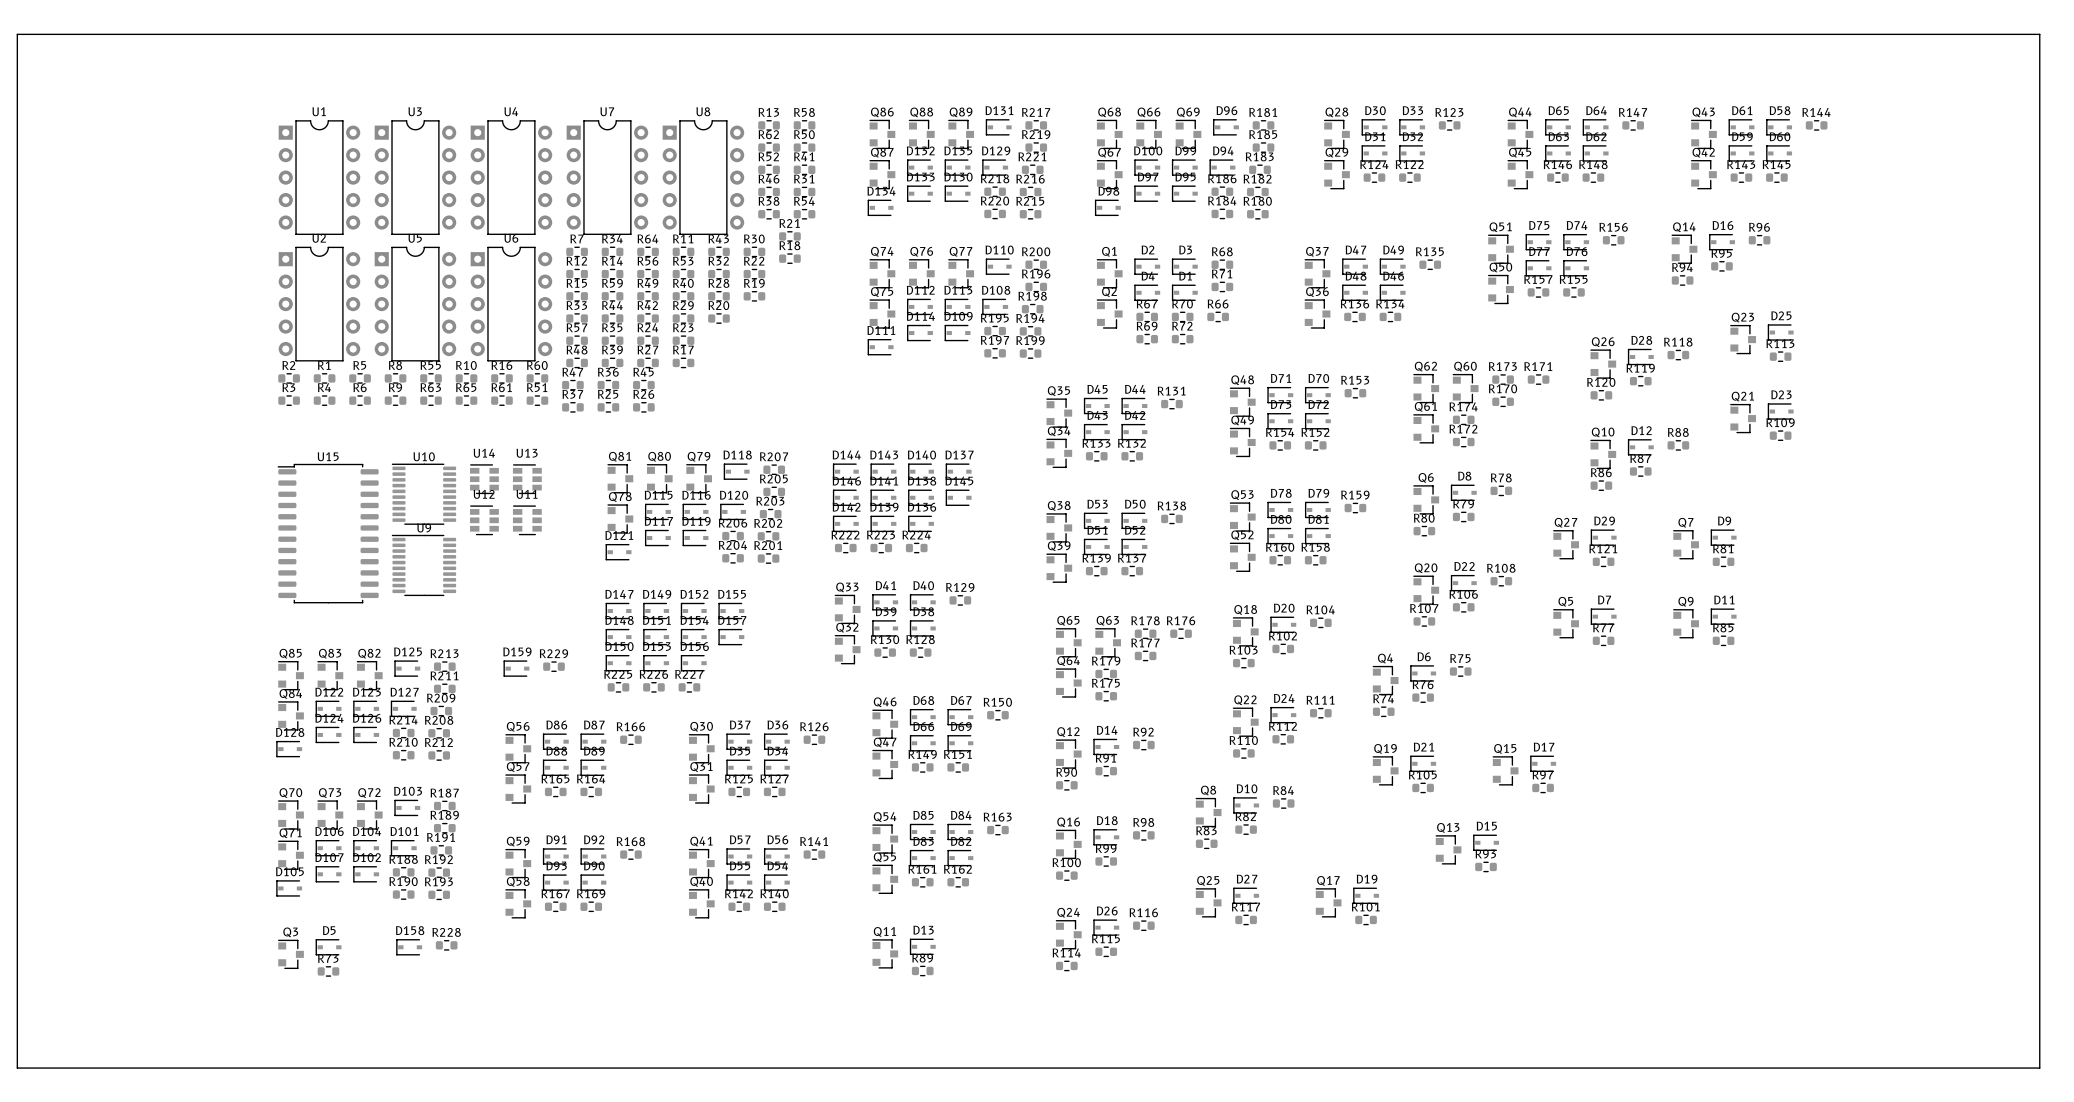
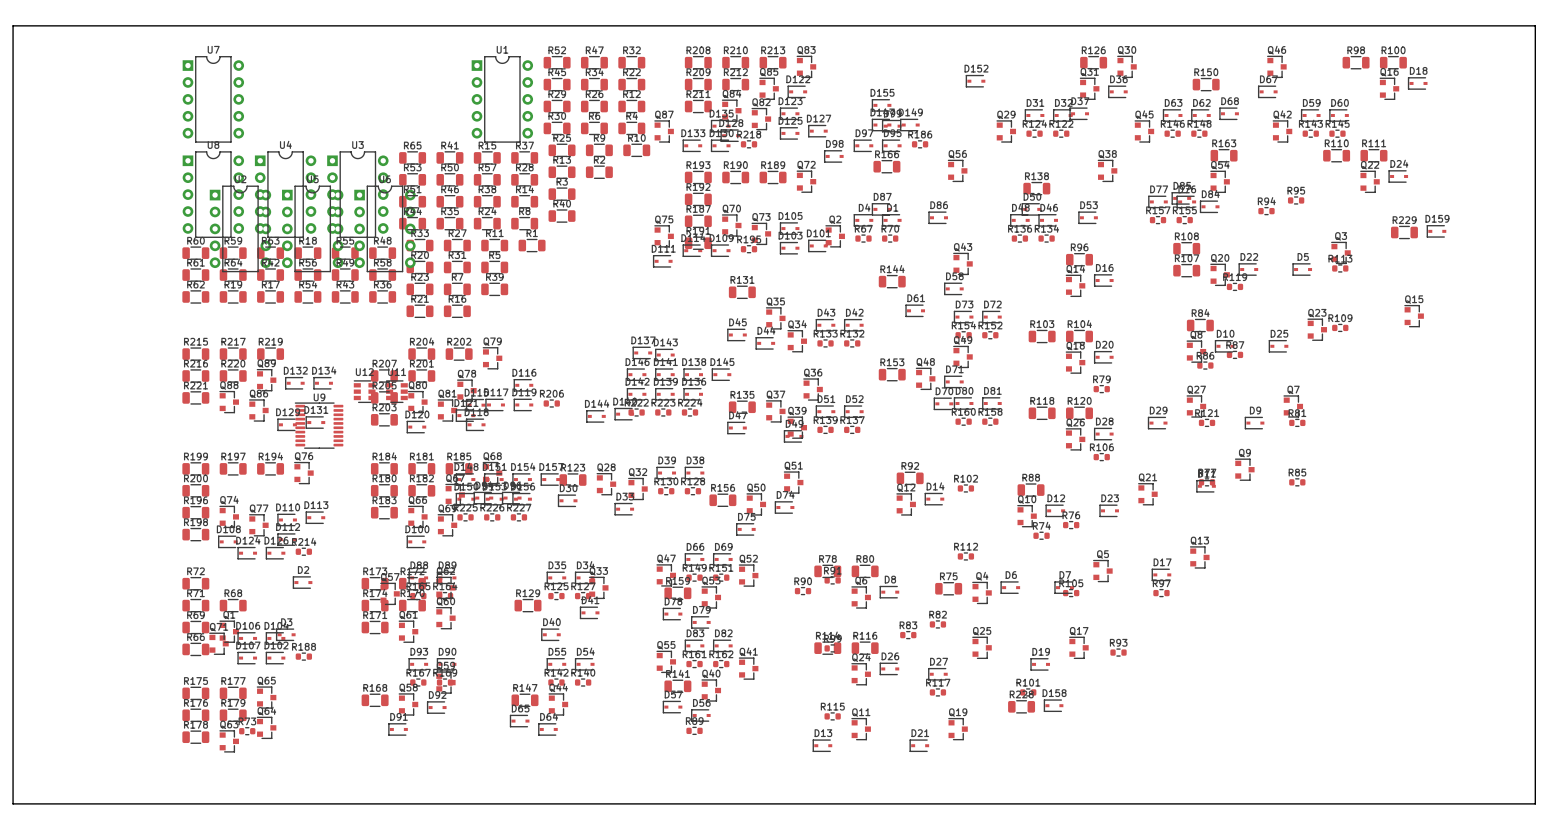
R13 footprint: [758, 120, 780, 131] -> [548, 165, 576, 179]
R58 footprint: [793, 120, 816, 131] -> [369, 268, 397, 282]
R217 footprint: [1025, 120, 1048, 131] -> [219, 347, 247, 361]
R181 footprint: [1252, 120, 1275, 131] -> [408, 462, 436, 476]
R123 footprint: [1438, 120, 1461, 131] -> [559, 473, 587, 487]
R147 footprint: [1622, 120, 1644, 131] -> [511, 693, 539, 707]
R144 footprint: [1805, 120, 1828, 131] -> [878, 275, 906, 289]
D131 position: (998, 127) -> (315, 422)
D96 position: (1226, 127) -> (511, 498)
D30 position: (1374, 127) -> (567, 500)
D33 position: (1412, 127) -> (624, 509)
D65 position: (1558, 127) -> (519, 721)
D64 position: (1595, 127) -> (548, 729)
D61 position: (1741, 127) -> (915, 310)
D58 position: (1779, 127) -> (954, 288)
Q86 position: (882, 134) -> (258, 410)
Q88 position: (921, 134) -> (229, 402)
Q89 position: (961, 134) -> (266, 380)
Q68 position: (1109, 134) -> (492, 473)
Q66 position: (1149, 134) -> (417, 516)
Q69 position: (1188, 134) -> (447, 525)
Q28 position: (1336, 134) -> (606, 484)
Q44 position: (1520, 134) -> (558, 704)
Q43 position: (1703, 134) -> (963, 263)
R62 footprint: [758, 142, 780, 153] -> [182, 290, 210, 304]
R50 footprint: [793, 142, 816, 153] -> [436, 173, 464, 187]
R219 footprint: [1025, 142, 1048, 153] -> [257, 347, 285, 361]
R185 footprint: [1252, 142, 1275, 153] -> [445, 462, 473, 476]
R52 footprint: [758, 164, 780, 175] -> [543, 56, 571, 70]
R41 footprint: [793, 164, 816, 175] -> [436, 151, 464, 165]
R221 footprint: [1021, 164, 1044, 175] -> [182, 391, 210, 405]
R183 footprint: [1249, 164, 1271, 175] -> [370, 506, 398, 520]
D132 position: (920, 167) -> (294, 383)
D129 position: (995, 167) -> (287, 424)
D100 position: (1147, 167) -> (416, 541)
D94 position: (1222, 167) -> (483, 498)
Q67 position: (1109, 174) -> (455, 494)
U1 position: (319, 177) -> (502, 99)
U3 position: (415, 177) -> (357, 194)
U4 position: (511, 177) -> (285, 194)
U7 position: (607, 177) -> (213, 99)
U8 position: (703, 177) -> (213, 194)
R46 footprint: [758, 186, 780, 198] -> [436, 195, 464, 209]
R31 footprint: [793, 186, 816, 198] -> [443, 260, 471, 274]
R216 footprint: [1019, 186, 1042, 198] -> [182, 369, 210, 383]
R182 footprint: [1247, 186, 1269, 198] -> [408, 484, 436, 498]
D134 position: (880, 207) -> (323, 383)
R220 footprint: [984, 208, 1006, 220] -> [219, 369, 247, 383]
R184 footprint: [1211, 208, 1234, 220] -> [370, 462, 398, 476]
R38 footprint: [758, 209, 780, 220] -> [473, 195, 501, 209]
R54 footprint: [793, 209, 816, 220] -> [294, 290, 322, 304]
R215 footprint: [1019, 209, 1042, 220] -> [182, 347, 210, 361]
R180 footprint: [1247, 209, 1269, 220] -> [370, 484, 398, 498]
R21 footprint: [779, 231, 801, 242] -> [406, 304, 434, 318]
R156 footprint: [1602, 235, 1625, 246] -> [709, 493, 737, 507]
R96 footprint: [1748, 235, 1771, 246] -> [1066, 253, 1093, 267]
D75 position: (1538, 242) -> (745, 529)
D74 position: (1576, 242) -> (784, 507)
D16 position: (1722, 242) -> (1103, 280)
R7 footprint: [566, 246, 588, 258] -> [443, 282, 471, 296]
R34 footprint: [601, 246, 624, 258] -> [580, 78, 608, 92]
R64 footprint: [637, 246, 659, 258] -> [219, 268, 247, 282]
R11 footprint: [672, 246, 695, 258] -> [481, 239, 509, 253]
R43 footprint: [708, 246, 730, 258] -> [331, 290, 359, 304]
R30 footprint: [743, 246, 766, 258] -> [543, 121, 571, 135]
Q51 position: (1501, 249) -> (793, 482)
Q14 position: (1684, 249) -> (1075, 285)
R18 footprint: [779, 253, 801, 264] -> [294, 246, 322, 260]
R200 footprint: [1025, 259, 1048, 270] -> [182, 484, 210, 498]
R68 footprint: [1211, 259, 1234, 270] -> [219, 599, 247, 613]
R135 footprint: [1419, 259, 1442, 270] -> [728, 400, 756, 414]
D110 position: (998, 266) -> (287, 519)
D2 position: (1147, 266) -> (302, 582)
D3 position: (1184, 266) -> (285, 634)
D47 position: (1355, 266) -> (737, 428)
D49 position: (1392, 266) -> (793, 436)
R12 footprint: [566, 268, 588, 280] -> [618, 100, 646, 113]
R14 footprint: [601, 268, 624, 280] -> [511, 195, 539, 209]
R56 footprint: [637, 268, 659, 280] -> [294, 268, 322, 282]
R53 footprint: [672, 268, 695, 280] -> [399, 173, 427, 187]
R32 footprint: [708, 268, 730, 280] -> [618, 56, 646, 70]
R22 footprint: [743, 268, 766, 280] -> [618, 78, 646, 92]
Q74 position: (882, 273) -> (229, 516)
Q76 position: (921, 273) -> (304, 473)
Q77 position: (961, 273) -> (258, 525)
Q1 position: (1109, 273) -> (229, 631)
Q37 position: (1317, 273) -> (775, 411)
R196 footprint: [1025, 281, 1048, 293] -> [182, 506, 210, 520]
R71 footprint: [1211, 281, 1234, 293] -> [182, 599, 210, 613]
Q50 position: (1501, 289) -> (756, 504)
R15 footprint: [566, 291, 588, 302] -> [473, 151, 501, 165]
R59 footprint: [601, 291, 624, 302] -> [219, 246, 247, 260]
R49 footprint: [637, 291, 659, 302] -> [331, 268, 359, 282]
R40 footprint: [672, 291, 695, 302] -> [548, 209, 576, 223]
R28 footprint: [708, 291, 730, 302] -> [511, 173, 539, 187]
R19 footprint: [743, 291, 766, 302] -> [219, 290, 247, 304]
R198 footprint: [1021, 303, 1044, 315] -> [182, 528, 210, 542]
D112 position: (920, 306) -> (287, 539)
D113 position: (957, 306) -> (315, 517)
D108 position: (995, 306) -> (227, 541)
R66 footprint: [1207, 311, 1229, 323] -> [182, 642, 210, 656]
R33 footprint: [566, 313, 588, 324] -> [406, 239, 434, 253]
R44 footprint: [601, 313, 624, 324] -> [399, 217, 427, 231]
R42 footprint: [637, 313, 659, 324] -> [257, 268, 285, 282]
R29 footprint: [672, 313, 695, 324] -> [543, 100, 571, 113]
R20 footprint: [708, 313, 730, 324] -> [406, 260, 434, 274]
Q36 position: (1317, 314) -> (813, 389)
R194 footprint: [1019, 326, 1042, 337] -> [257, 462, 285, 476]
D25 position: (1780, 332) -> (1278, 346)
R69 footprint: [1136, 333, 1159, 345] -> [182, 621, 210, 634]
R72 footprint: [1171, 333, 1194, 345] -> [182, 577, 210, 591]
R57 footprint: [566, 335, 588, 346] -> [473, 173, 501, 187]
R35 footprint: [601, 335, 624, 346] -> [436, 217, 464, 231]
R24 footprint: [637, 335, 659, 346] -> [473, 217, 501, 231]
R23 footprint: [672, 335, 695, 346] -> [406, 282, 434, 296]
Q23 position: (1743, 339) -> (1317, 329)
R197 footprint: [984, 348, 1006, 359] -> [219, 462, 247, 476]
R199 footprint: [1019, 348, 1042, 359] -> [182, 462, 210, 476]
R118 footprint: [1667, 349, 1690, 361] -> [1028, 406, 1056, 420]
R48 footprint: [566, 357, 588, 369] -> [369, 246, 397, 260]
R39 footprint: [601, 357, 624, 369] -> [481, 282, 509, 296]
R27 footprint: [637, 357, 659, 369] -> [443, 239, 471, 253]
R17 footprint: [672, 357, 695, 369] -> [257, 290, 285, 304]
D28 position: (1640, 357) -> (1103, 434)
Q26 position: (1603, 364) -> (1075, 439)
R2 footprint: [278, 373, 300, 384] -> [585, 165, 613, 179]
R1 footprint: [313, 373, 336, 384] -> [518, 239, 546, 253]
R5 footprint: [349, 373, 371, 384] -> [481, 260, 509, 274]
R8 footprint: [384, 373, 407, 384] -> [511, 217, 539, 231]
R55 footprint: [420, 373, 442, 384] -> [331, 246, 359, 260]
R10 footprint: [455, 373, 478, 384] -> [623, 143, 651, 157]
R16 footprint: [491, 373, 513, 384] -> [443, 304, 471, 318]
R60 footprint: [526, 373, 549, 384] -> [182, 246, 210, 260]
R173 footprint: [1492, 374, 1514, 385] -> [361, 577, 389, 591]
R171 footprint: [1527, 374, 1550, 385] -> [361, 621, 389, 634]
R47 footprint: [562, 379, 584, 391] -> [580, 56, 608, 70]
R36 footprint: [597, 379, 620, 391] -> [369, 290, 397, 304]
R45 footprint: [633, 379, 655, 391] -> [543, 78, 571, 92]
R153 footprint: [1344, 388, 1367, 399] -> [878, 368, 906, 382]
Q62 position: (1426, 388) -> (445, 587)
Q60 position: (1465, 388) -> (445, 618)
R120 footprint: [1590, 390, 1613, 401] -> [1066, 406, 1093, 420]
R3 footprint: [278, 395, 300, 406] -> [548, 187, 576, 201]
R4 footprint: [313, 395, 336, 406] -> [618, 121, 646, 135]
R6 footprint: [349, 395, 371, 406] -> [580, 121, 608, 135]
R9 footprint: [384, 395, 407, 406] -> [585, 143, 613, 157]
R63 footprint: [420, 395, 442, 406] -> [257, 246, 285, 260]
R65 footprint: [455, 395, 478, 406] -> [399, 151, 427, 165]
R61 footprint: [491, 395, 513, 406] -> [182, 268, 210, 282]
R51 footprint: [526, 395, 549, 406] -> [399, 195, 427, 209]
D71 position: (1280, 395) -> (954, 381)
D70 position: (1317, 395) -> (943, 403)
R170 footprint: [1492, 396, 1514, 407] -> [398, 599, 426, 613]
R131 footprint: [1161, 398, 1183, 410] -> [728, 285, 756, 299]
R37 footprint: [562, 402, 584, 413] -> [511, 151, 539, 165]
R25 footprint: [597, 402, 620, 413] -> [548, 143, 576, 157]
R26 footprint: [633, 402, 655, 413] -> [580, 100, 608, 113]
Q48 position: (1242, 402) -> (925, 378)
D45 position: (1096, 406) -> (737, 334)
D44 position: (1134, 406) -> (765, 343)
D23 position: (1780, 411) -> (1109, 510)
Q35 position: (1059, 413) -> (775, 318)
R174 footprint: [1452, 414, 1475, 425] -> [361, 599, 389, 613]
Q21 position: (1743, 418) -> (1147, 494)
Q61 position: (1426, 428) -> (408, 631)
R172 footprint: [1452, 436, 1475, 448] -> [398, 577, 426, 591]
R88 footprint: [1667, 440, 1690, 451] -> [1017, 483, 1045, 497]
Q49 position: (1242, 442) -> (963, 356)
D12 position: (1640, 447) -> (1055, 510)
Q10 position: (1603, 454) -> (1027, 516)
R207 footprint: [763, 464, 786, 475] -> [370, 369, 398, 383]
D118 position: (736, 471) -> (475, 424)
D144 position: (845, 471) -> (596, 416)
D140 position: (921, 471) -> (624, 414)
D137 position: (958, 471) -> (642, 352)
Q81 position: (620, 478) -> (447, 410)
Q80 position: (659, 478) -> (417, 402)
Q79 position: (699, 478) -> (492, 358)
U14: (484, 479) -> none
U13: (527, 479) -> none
R78 footprint: [1490, 485, 1513, 497] -> [814, 564, 842, 578]
R205 footprint: [763, 486, 786, 498] -> [370, 391, 398, 405]
D8 position: (1463, 492) -> (889, 592)
U10: (424, 494) -> none
Q6 position: (1426, 499) -> (861, 597)
R159 footprint: [1344, 502, 1367, 514] -> [664, 586, 692, 600]
R203 footprint: [759, 508, 782, 520] -> [370, 413, 398, 427]
D78 position: (1280, 509) -> (672, 614)
D79 position: (1317, 509) -> (700, 622)
D115 position: (657, 511) -> (475, 405)
D120 position: (733, 511) -> (416, 427)
R138 footprint: [1161, 513, 1183, 525] -> [1023, 182, 1051, 196]
Q53 position: (1242, 517) -> (711, 597)
D53 position: (1096, 520) -> (1088, 217)
D50 position: (1134, 520) -> (1031, 209)
R80 footprint: [1413, 525, 1436, 537] -> [851, 564, 879, 578]
Q38 position: (1059, 527) -> (1107, 170)
R202 footprint: [757, 531, 780, 542] -> [445, 347, 473, 361]
U15: (328, 533) -> none
D29 position: (1603, 537) -> (1157, 423)
D9 position: (1723, 537) -> (1254, 423)
Q27 position: (1566, 544) -> (1196, 406)
Q7 position: (1686, 544) -> (1293, 406)
R204 footprint: [722, 553, 744, 564] -> [408, 347, 436, 361]
R201 footprint: [757, 553, 780, 564] -> [408, 369, 436, 383]
Q52 position: (1242, 557) -> (748, 575)
R108 footprint: [1490, 576, 1513, 587] -> [1173, 242, 1201, 256]
D22 position: (1463, 583) -> (1248, 269)
Q20 position: (1426, 590) -> (1220, 274)
R129 footprint: [949, 595, 972, 606] -> [514, 599, 542, 613]
D41 position: (885, 602) -> (589, 612)
D40 position: (922, 602) -> (551, 634)
Q33 position: (847, 609) -> (598, 587)
D147 position: (618, 611) -> (881, 125)
D149 position: (656, 611) -> (909, 125)
D152 position: (693, 611) -> (975, 81)
D155 position: (731, 611) -> (881, 105)
R107 footprint: [1413, 616, 1436, 627] -> [1173, 264, 1201, 278]
D7 position: (1603, 616) -> (1064, 587)
D11 position: (1723, 616) -> (1206, 486)
R104 footprint: [1310, 617, 1332, 629] -> [1066, 330, 1093, 343]
Q5 position: (1566, 623) -> (1102, 571)
Q9 position: (1686, 623) -> (1244, 469)
D20 position: (1283, 624) -> (1103, 357)
R178 footprint: [1134, 628, 1157, 639] -> [182, 730, 210, 744]
R176 footprint: [1170, 628, 1192, 639] -> [182, 708, 210, 722]
Q18 position: (1245, 631) -> (1075, 362)
Q65 position: (1068, 642) -> (266, 697)
Q63 position: (1108, 642) -> (229, 741)
R177 footprint: [1134, 650, 1157, 662] -> [219, 686, 247, 700]
R103 footprint: [1233, 657, 1255, 669] -> [1028, 330, 1056, 343]
R213 footprint: [433, 661, 456, 672] -> [759, 56, 787, 70]
R229 footprint: [543, 661, 565, 672] -> [1390, 226, 1418, 239]
R75 footprint: [1449, 666, 1472, 677] -> [935, 582, 963, 596]
D125 position: (407, 668) -> (789, 133)
D159 position: (516, 668) -> (1436, 231)
R179 footprint: [1095, 668, 1118, 680] -> [219, 708, 247, 722]
D6 position: (1423, 673) -> (1010, 587)
Q85 position: (291, 675) -> (769, 88)
Q83 position: (330, 675) -> (806, 66)
Q82 position: (369, 675) -> (761, 119)
Q4 position: (1385, 680) -> (982, 592)
R211 footprint: [433, 683, 456, 695] -> [684, 100, 712, 113]
Q64 position: (1068, 683) -> (266, 727)
R175 footprint: [1095, 691, 1118, 702] -> [182, 686, 210, 700]
R209 footprint: [430, 705, 453, 717] -> [684, 78, 712, 92]
D122 position: (328, 708) -> (797, 91)
D123 position: (366, 708) -> (789, 113)
D127 position: (403, 708) -> (818, 131)
R111 footprint: [1310, 708, 1332, 719] -> [1360, 149, 1388, 163]
R150 footprint: [987, 710, 1009, 721] -> [1192, 78, 1220, 92]
Q84 position: (291, 715) -> (731, 110)
D24 position: (1283, 715) -> (1398, 176)
D68 position: (922, 717) -> (1229, 113)
D67 position: (960, 717) -> (1267, 91)
Q22 position: (1245, 722) -> (1370, 181)
Q46 position: (885, 724) -> (1276, 66)
R208 footprint: [428, 728, 450, 739] -> [684, 56, 712, 70]
R166 footprint: [620, 734, 642, 745] -> [873, 160, 901, 174]
R126 footprint: [803, 734, 826, 745] -> [1080, 56, 1108, 70]
R92 footprint: [1132, 739, 1155, 751] -> [896, 471, 924, 485]
D86 position: (555, 741) -> (938, 217)
D87 position: (593, 741) -> (881, 209)
D37 position: (739, 741) -> (1079, 113)
D36 position: (776, 741) -> (1118, 91)
D14 position: (1106, 746) -> (934, 499)
Q56 position: (518, 748) -> (957, 170)
Q30 position: (701, 748) -> (1127, 66)
R110 footprint: [1233, 748, 1255, 759] -> [1323, 149, 1351, 163]
D128 position: (289, 749) -> (730, 135)
R210 footprint: [392, 750, 415, 761] -> [722, 56, 750, 70]
R212 footprint: [428, 750, 450, 761] -> [722, 78, 750, 92]
Q12 position: (1068, 754) -> (906, 504)
D21 position: (1423, 763) -> (919, 745)
Q19 position: (1385, 770) -> (958, 729)
Q15 position: (1505, 770) -> (1414, 316)
Q31 position: (701, 789) -> (1089, 88)
R84 footprint: [1272, 798, 1295, 809] -> [1186, 319, 1214, 332]
R187 footprint: [433, 800, 456, 812] -> [684, 214, 712, 228]
D10 position: (1246, 805) -> (1224, 346)
D103 position: (407, 807) -> (789, 248)
Q8 position: (1208, 812) -> (1196, 351)
Q70 position: (291, 815) -> (731, 225)
Q73 position: (330, 815) -> (761, 233)
Q72 position: (369, 815) -> (806, 181)
R189 footprint: [433, 823, 456, 834] -> [759, 171, 787, 184]
R163 footprint: [987, 824, 1009, 836] -> [1210, 149, 1238, 163]
R98 footprint: [1132, 830, 1155, 841] -> [1342, 56, 1370, 70]
D85 position: (922, 832) -> (1181, 198)
D84 position: (960, 832) -> (1209, 206)
D18 position: (1106, 837) -> (1417, 83)
Q54 position: (885, 839) -> (1220, 181)
D15: (1486, 842) -> none
Q16 position: (1068, 844) -> (1389, 88)
R191 footprint: [430, 845, 453, 856] -> [684, 236, 712, 250]
D101 position: (403, 848) -> (818, 245)
R168 footprint: [620, 849, 642, 860] -> [361, 693, 389, 707]
R141 footprint: [803, 849, 826, 860] -> [664, 679, 692, 693]
Q13 position: (1448, 849) -> (1199, 557)
D91 position: (555, 856) -> (398, 729)
D92 position: (593, 856) -> (436, 707)
D57 position: (739, 856) -> (672, 707)
D56 position: (776, 856) -> (700, 715)
Q59 position: (518, 863) -> (445, 682)
Q41 position: (701, 863) -> (748, 668)
R192 footprint: [428, 867, 450, 878] -> [684, 192, 712, 206]
R100 footprint: [1056, 870, 1078, 881] -> [1379, 56, 1407, 70]
D105 position: (289, 888) -> (789, 228)
R190 footprint: [392, 889, 415, 900] -> [722, 171, 750, 184]
R193 footprint: [428, 889, 450, 900] -> [684, 171, 712, 184]
D19 position: (1366, 895) -> (1040, 664)
Q25 position: (1208, 902) -> (982, 647)
Q17 position: (1328, 902) -> (1079, 647)
Q58 position: (518, 903) -> (408, 704)
Q40 position: (701, 903) -> (711, 690)
R116 footprint: [1132, 920, 1155, 931] -> [851, 641, 879, 655]
D26 position: (1106, 927) -> (889, 668)
Q24 position: (1068, 934) -> (861, 674)
R228 footprint: [435, 940, 458, 951] -> [1008, 700, 1036, 714]
D13 position: (922, 946) -> (822, 745)
D5 position: (328, 947) -> (1302, 269)
D158 position: (409, 947) -> (1053, 705)
Q11 position: (885, 953) -> (861, 729)
Q3 position: (291, 954) -> (1341, 252)
R114 footprint: [1056, 960, 1078, 972] -> [814, 641, 842, 655]

